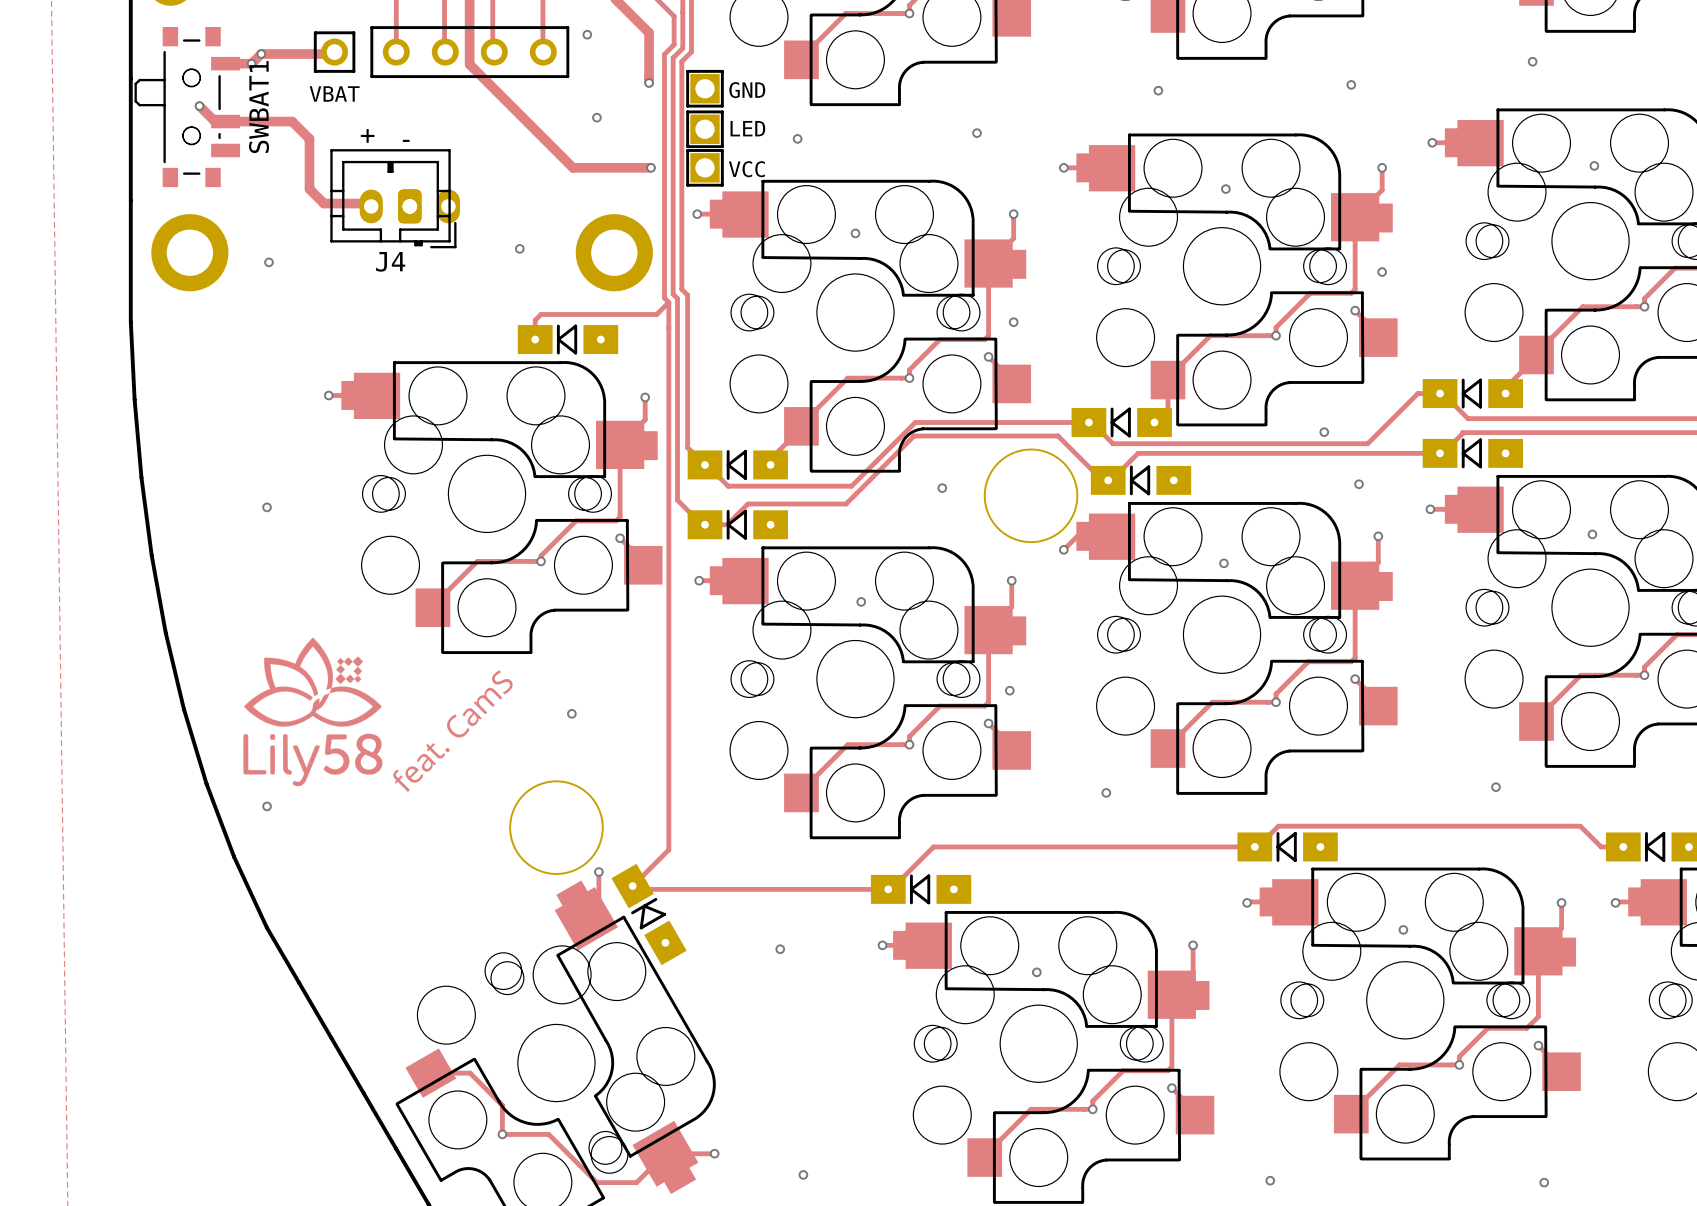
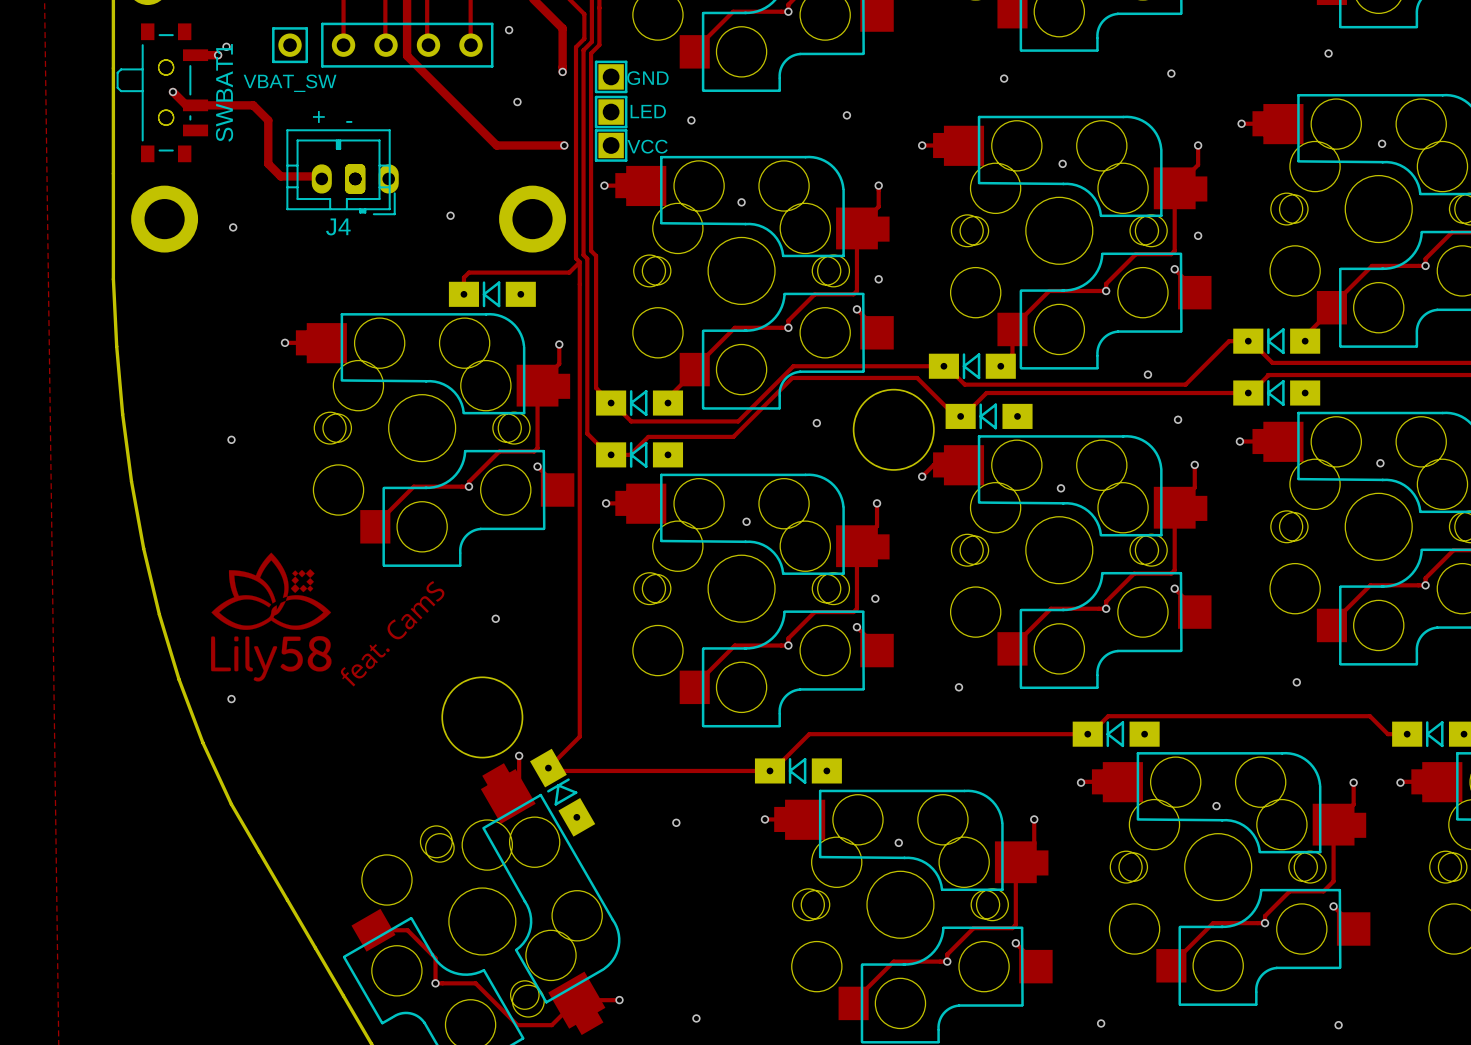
track: (334, 54) (261, 54) (251, 63) -> none
part value: VBAT (334, 93) -> VBAT_SW (290, 83)

